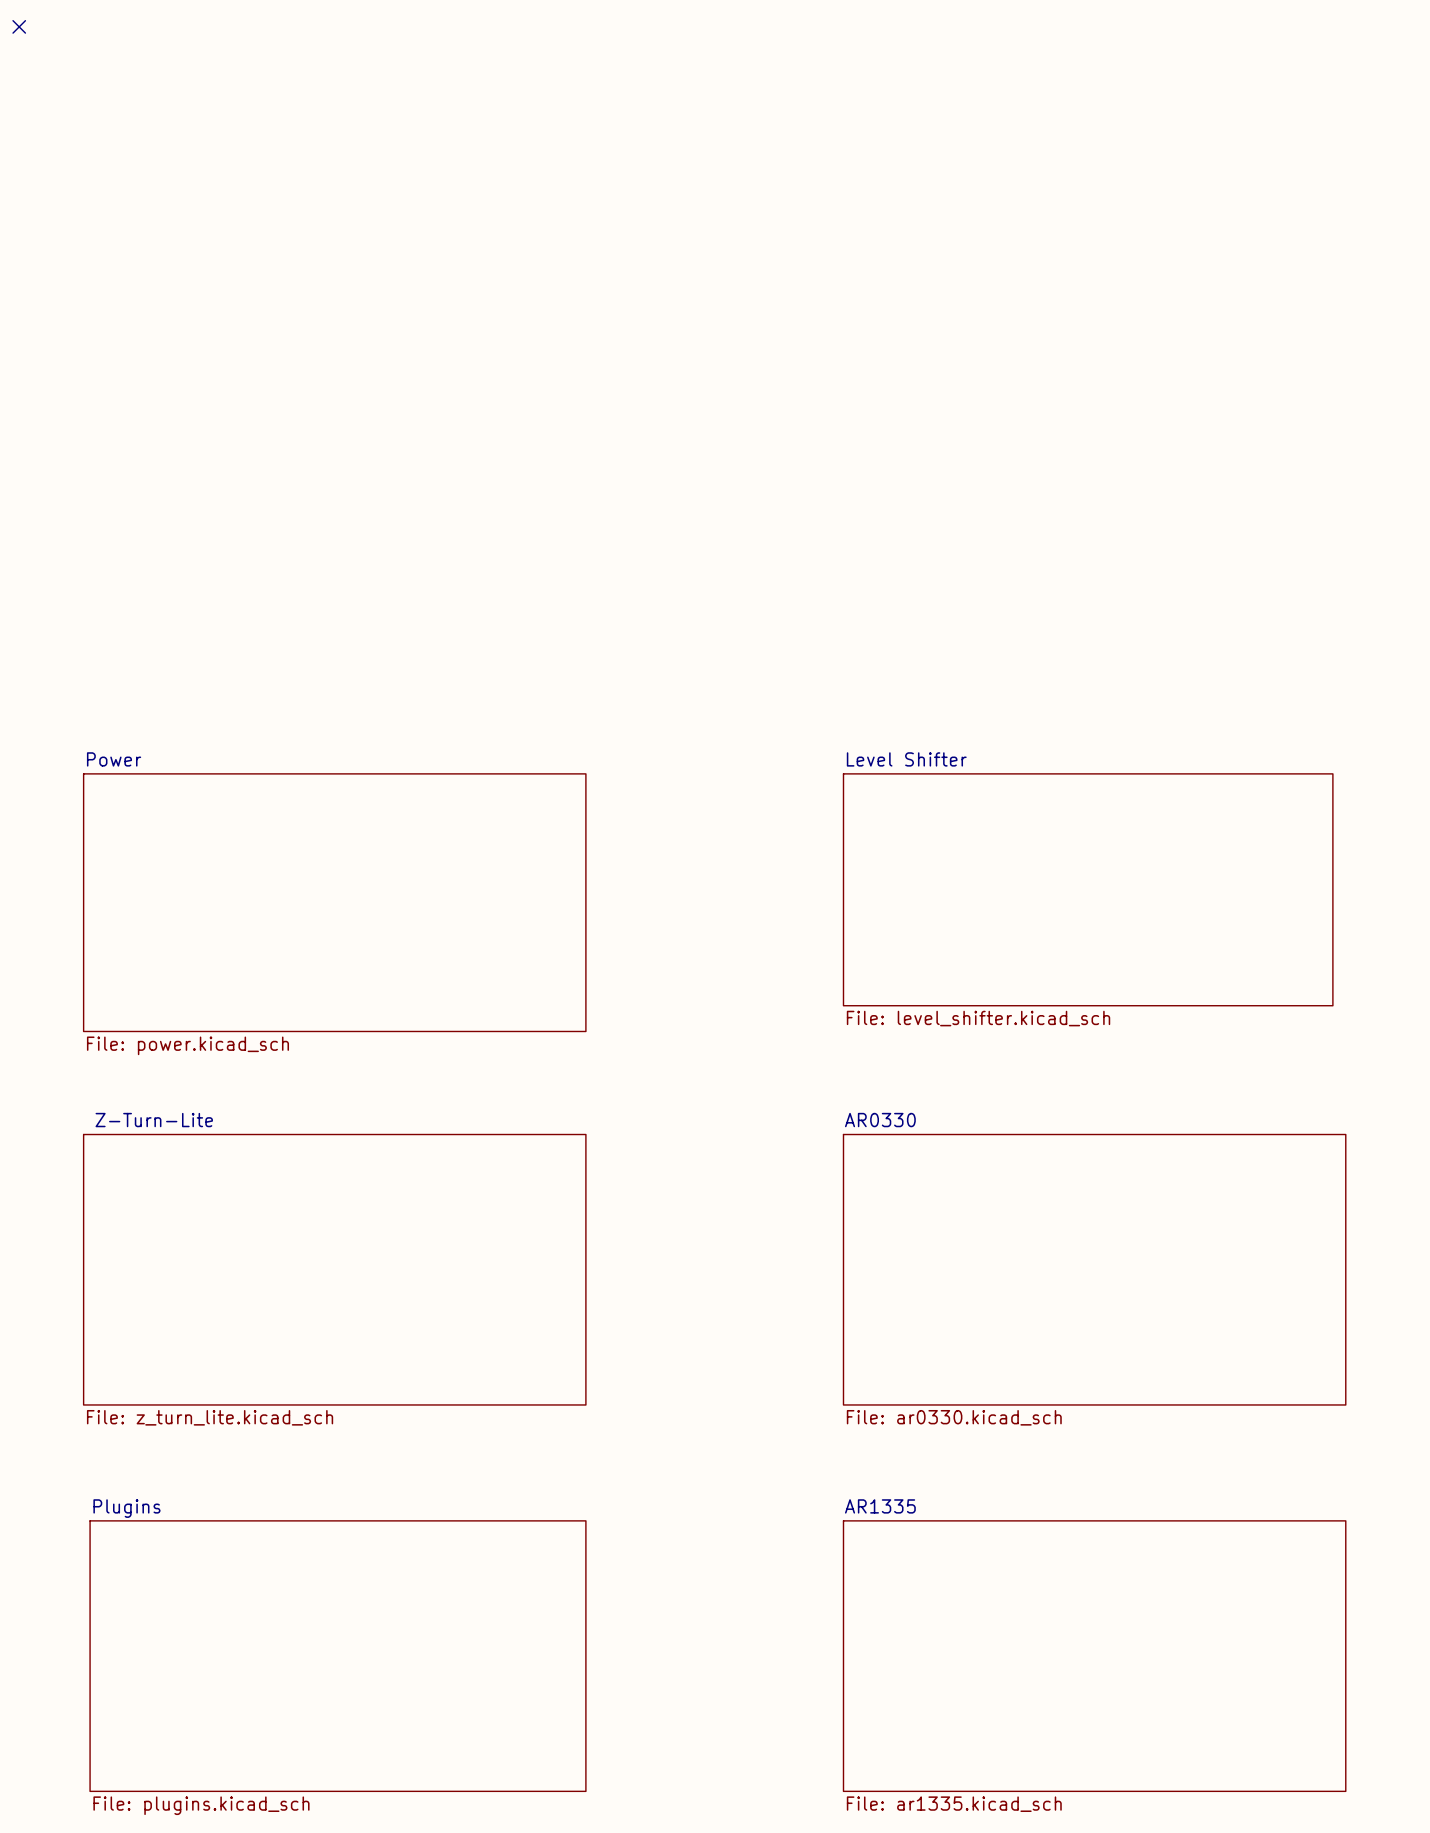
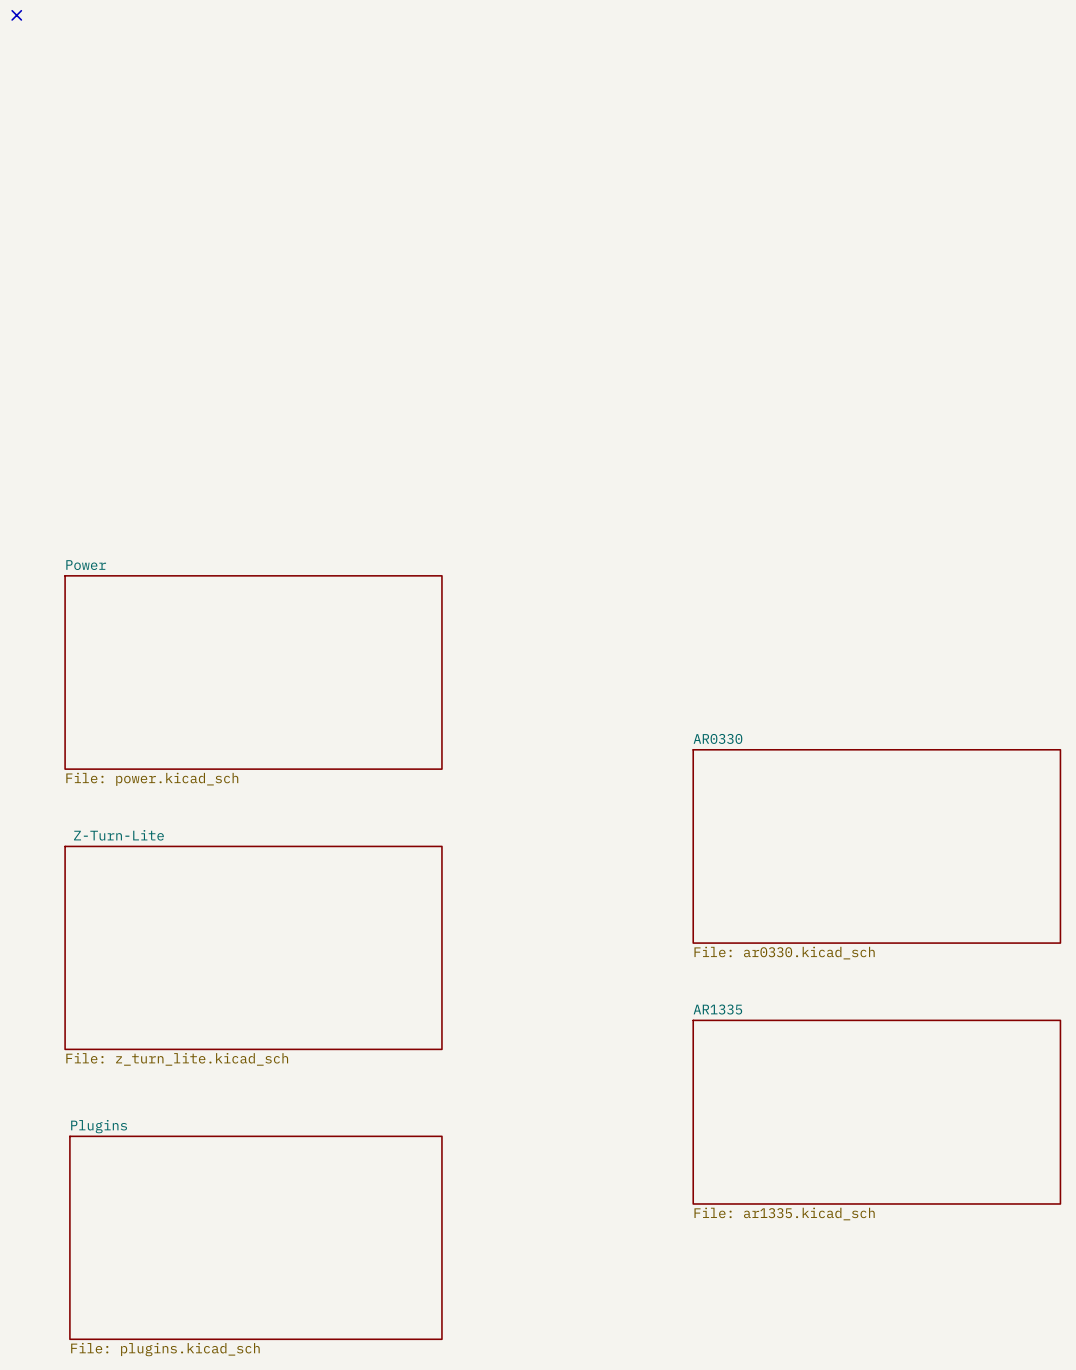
sheet Level Shifter: File: level_shifter.kicad_sch (1088, 889) -> none
sheet AR0330 shape: [843, 1134, 1346, 1405] -> [693, 749, 1061, 944]
sheet AR1335 shape: [843, 1520, 1346, 1792] -> [693, 1020, 1061, 1204]

